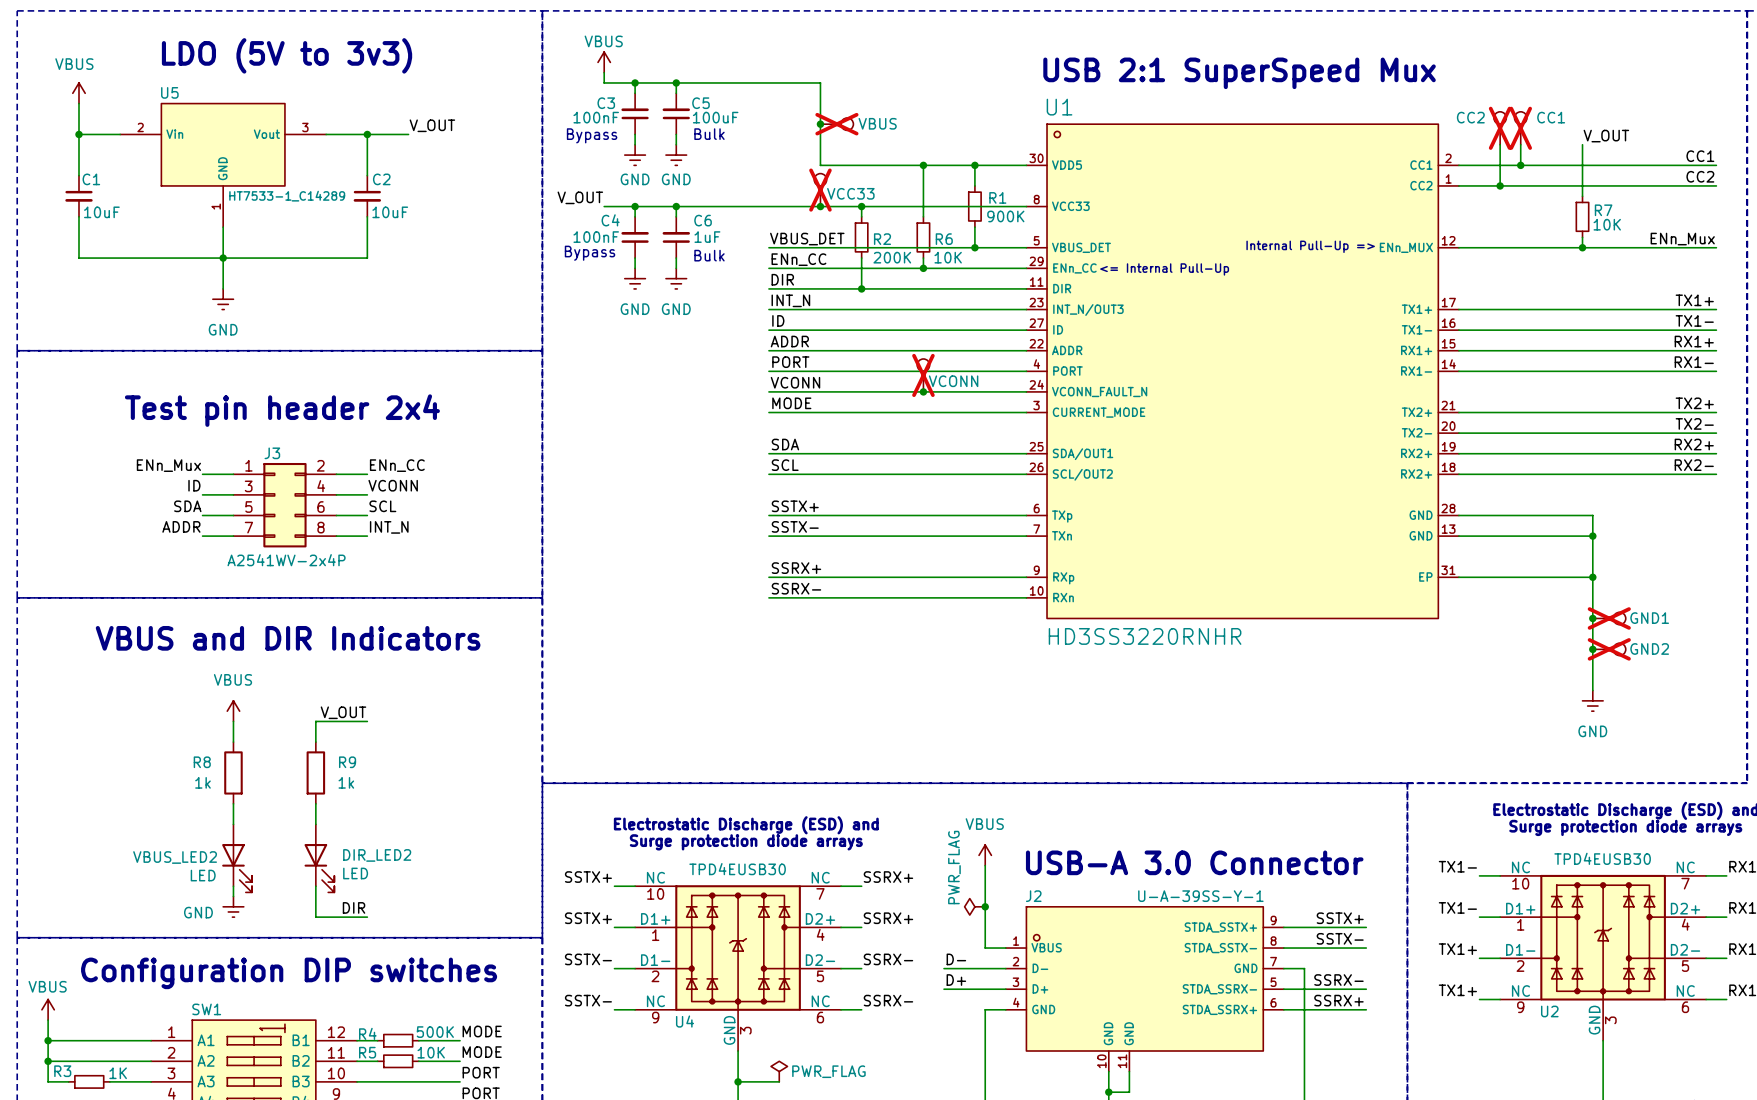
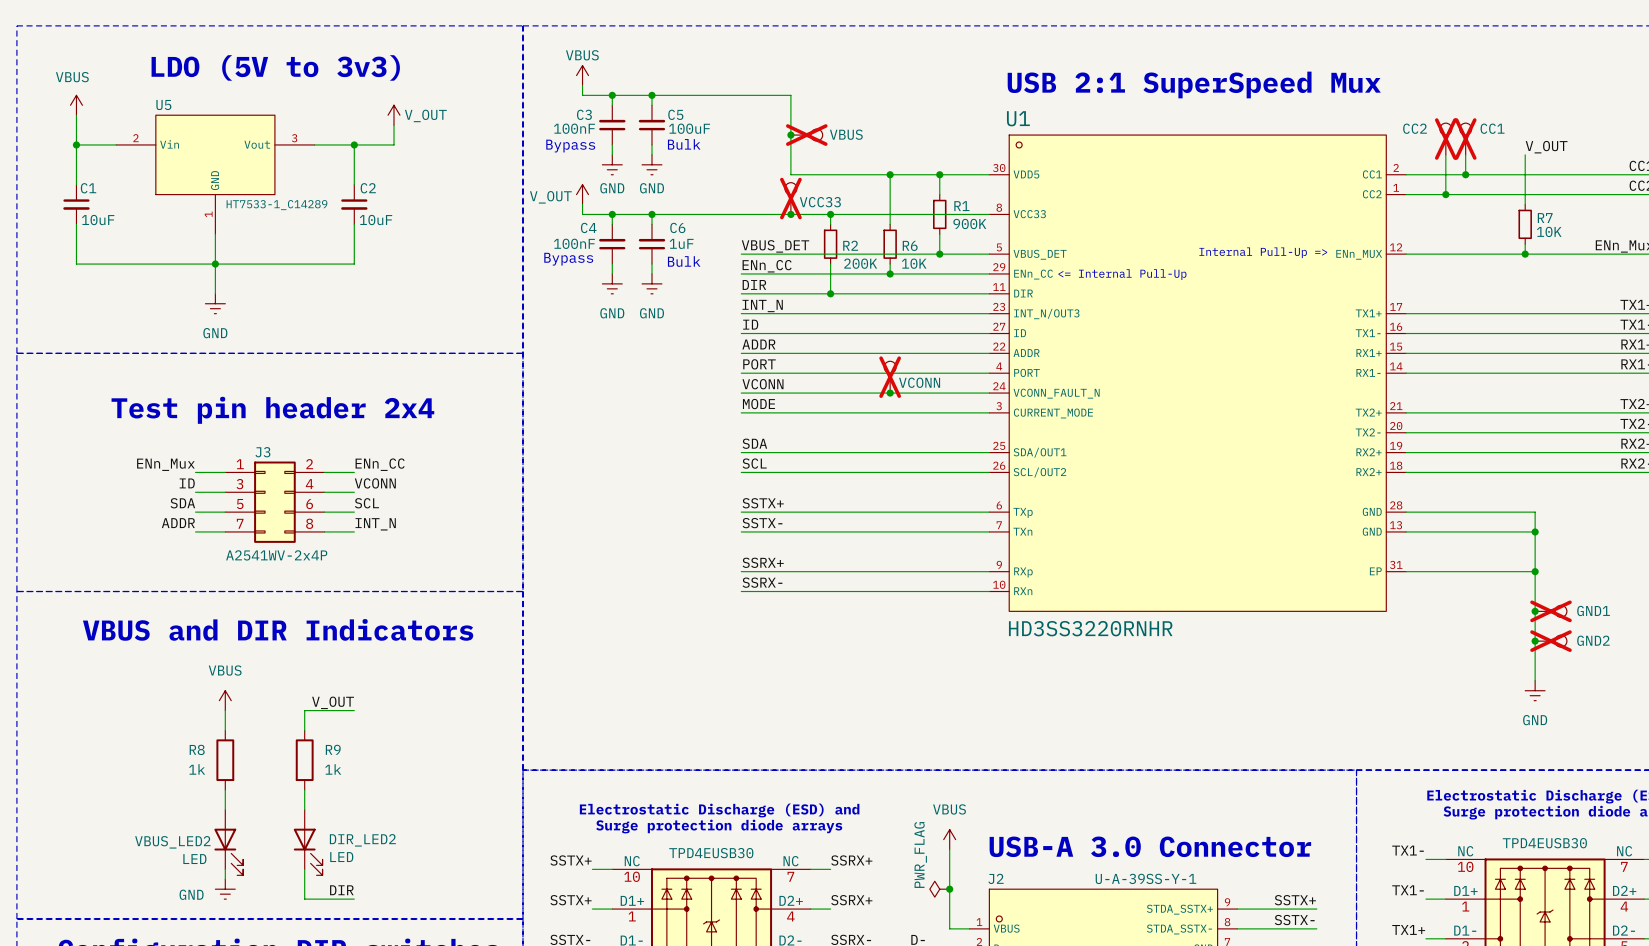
power symbol: none -> V_OUT (394, 115)
wire: none -> (394, 125) (394, 144)
label: V_OUT (432, 125) -> none
power symbol: none -> V_OUT (582, 194)
wire: none -> (582, 204) (582, 214)
label: V_OUT (580, 197) -> none

